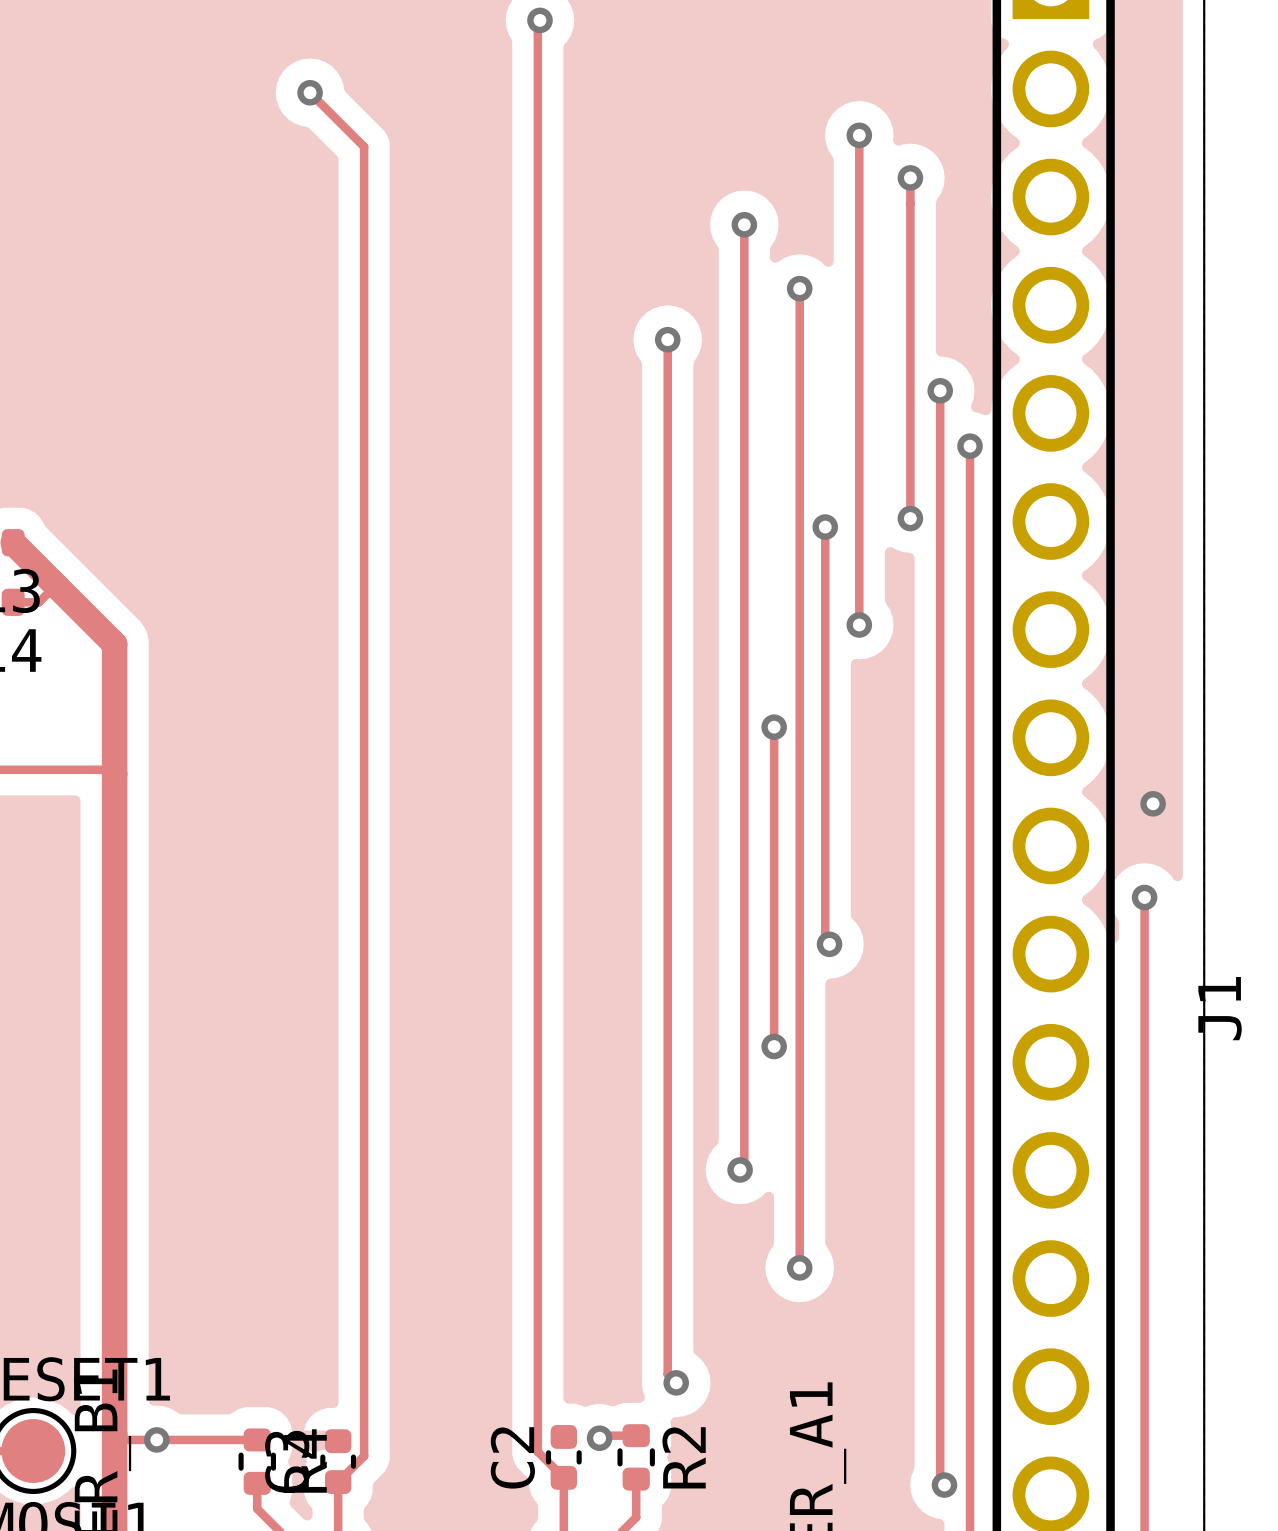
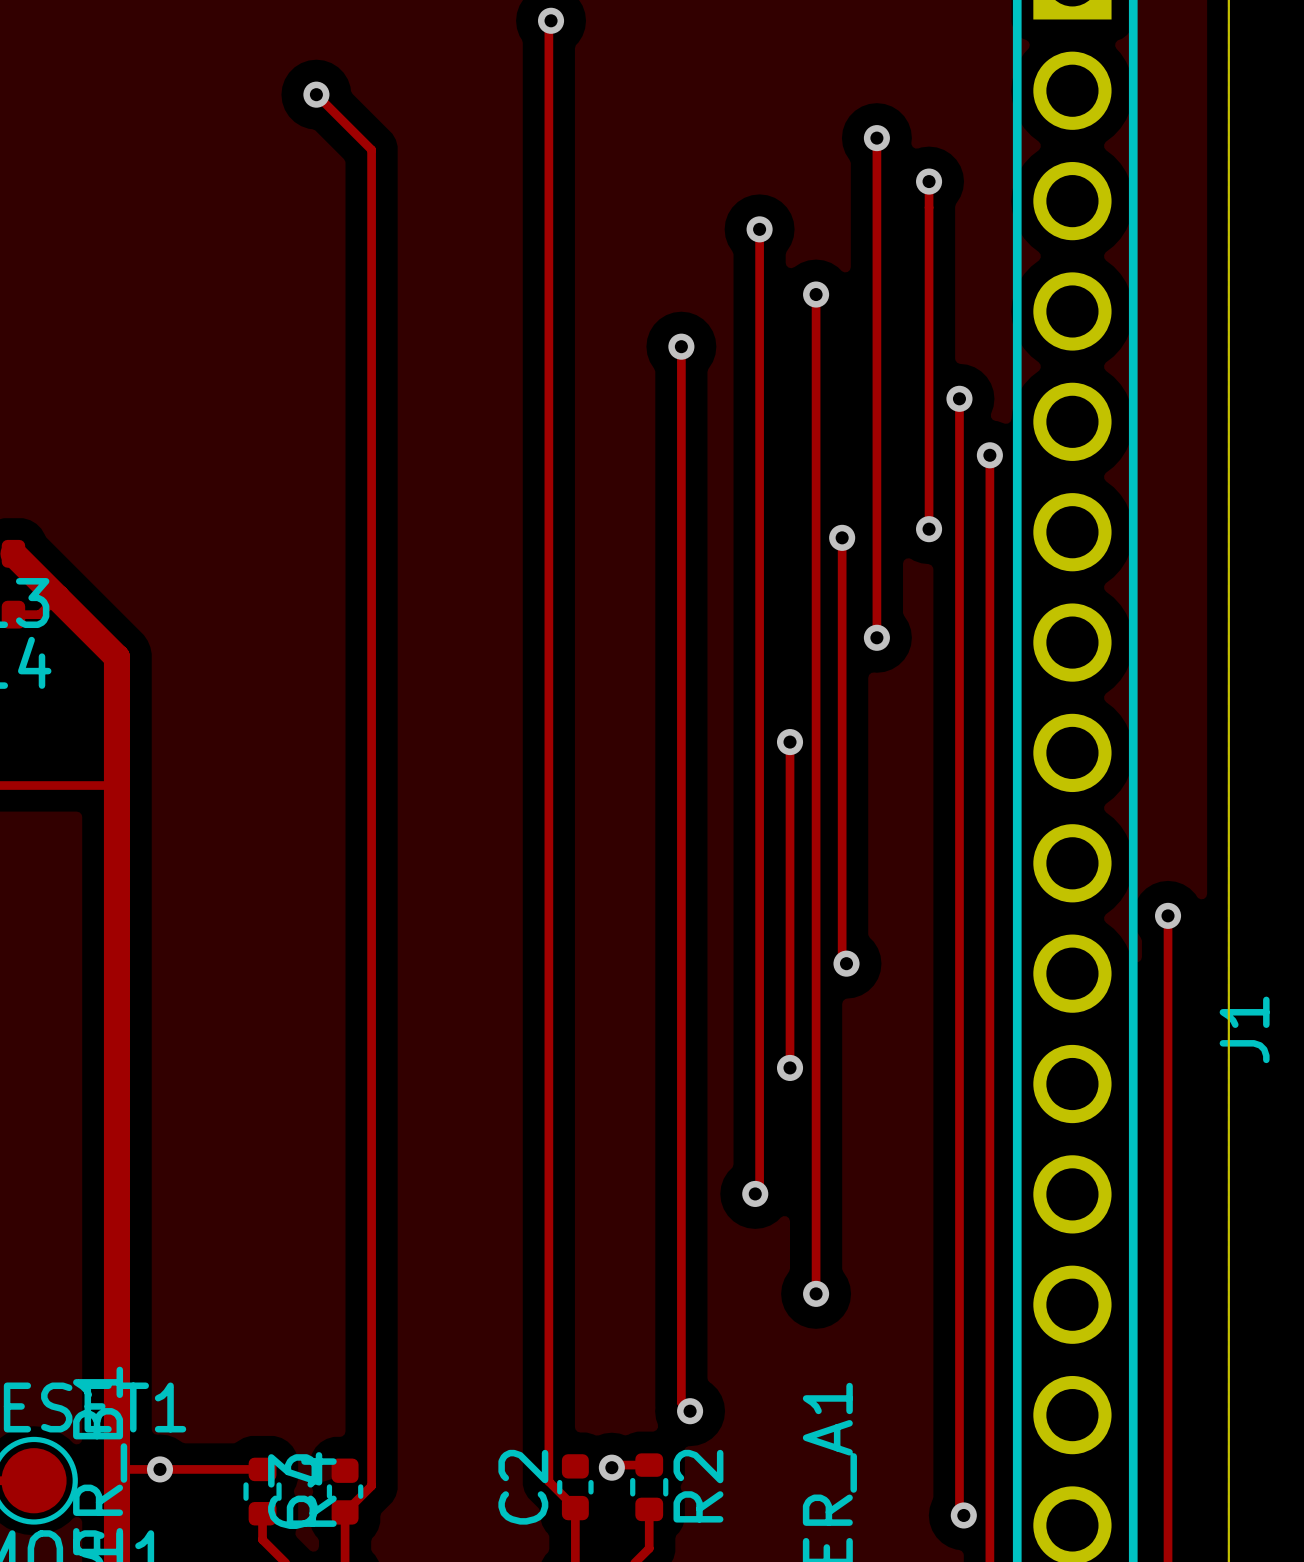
via: (1153, 803) -> none

